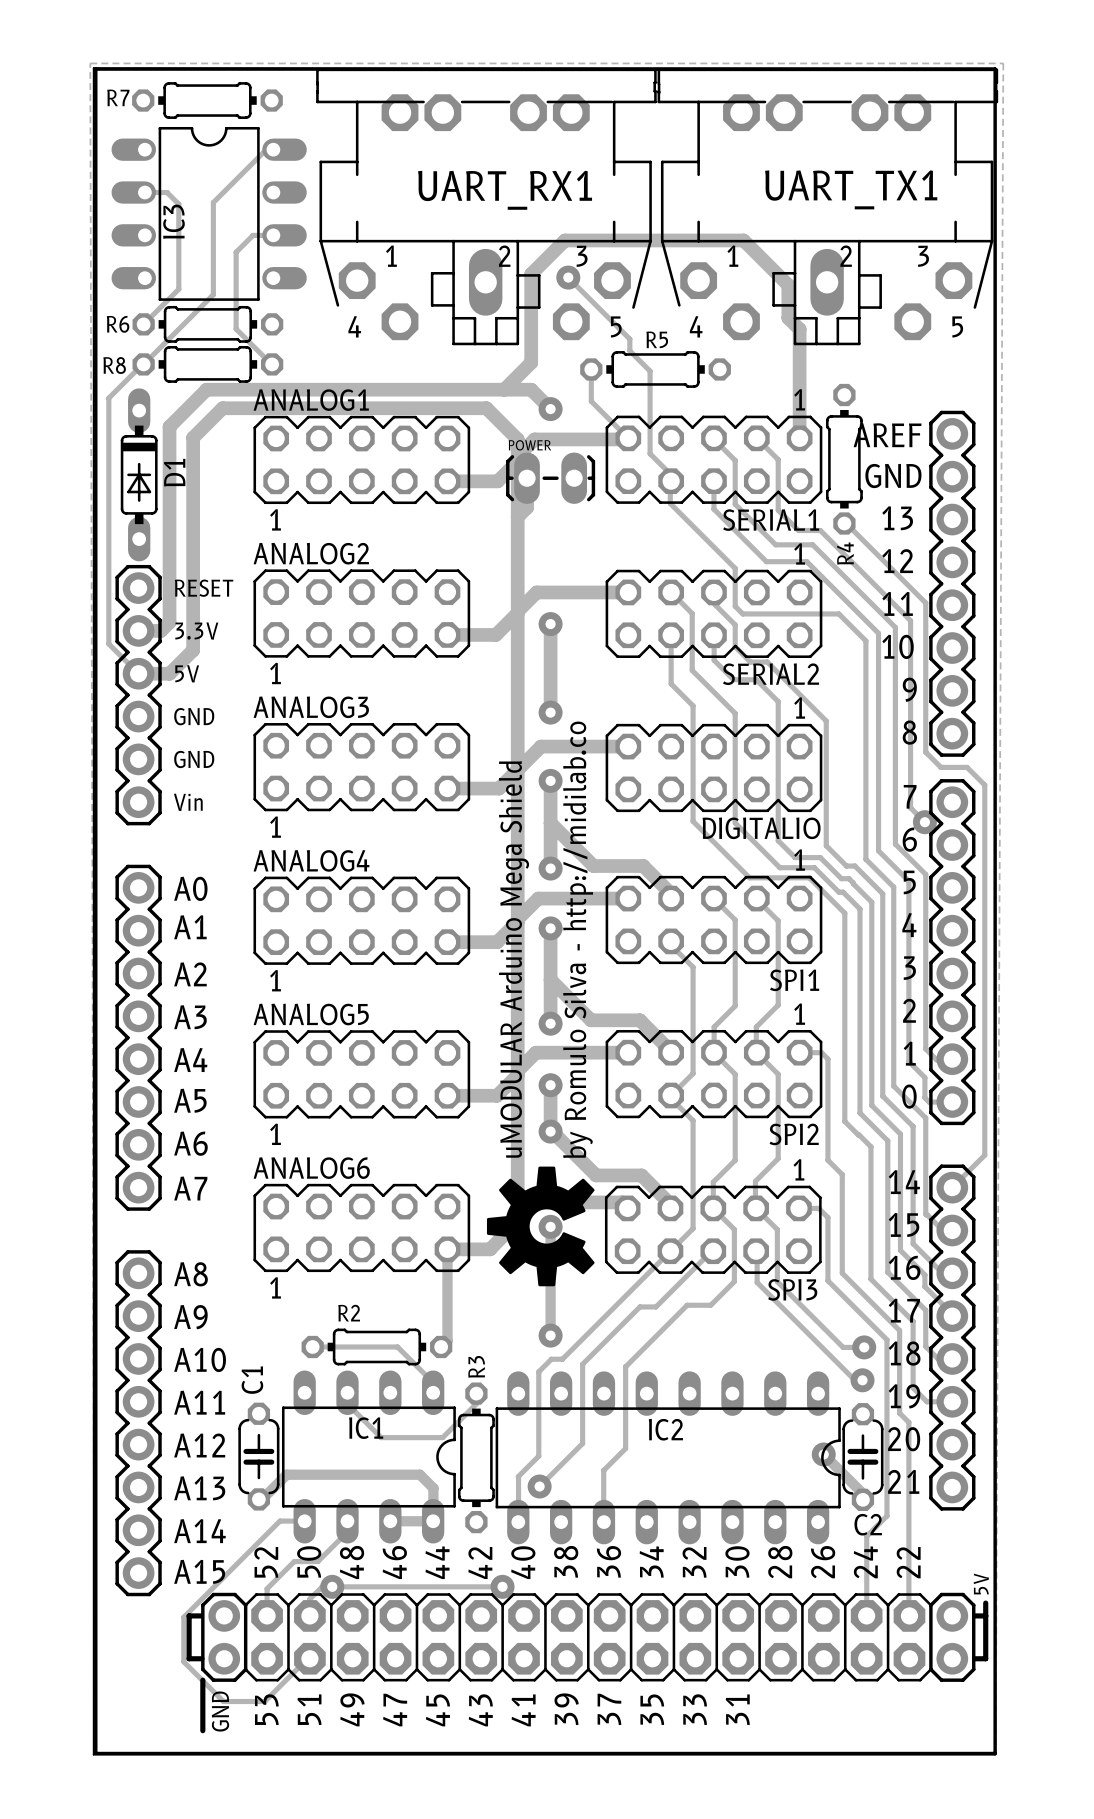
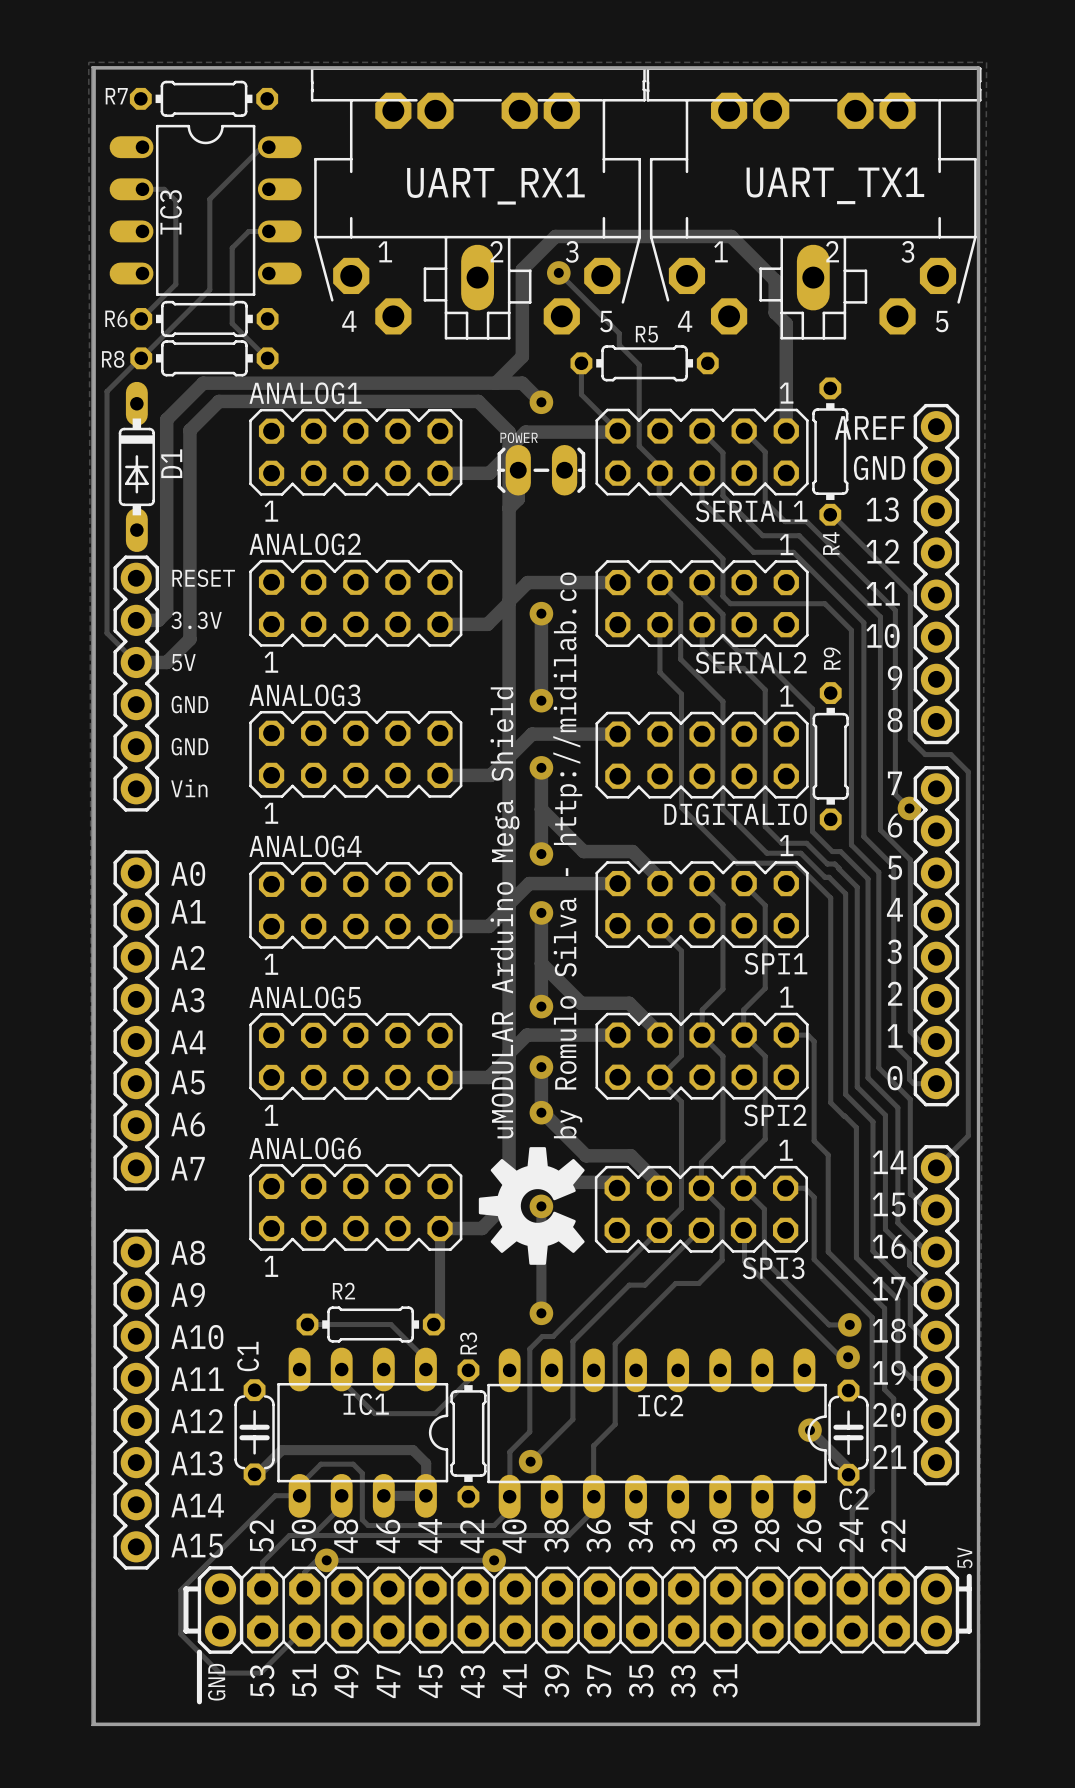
R9: none -> (830, 756)
track: none -> (299, 1495) (299, 1485) (320, 1464) (353, 1464) (362, 1473) (362, 1519) (368, 1525) (494, 1525) (509, 1509)
track: none -> (593, 1510) (568, 1535) (312, 1535)

